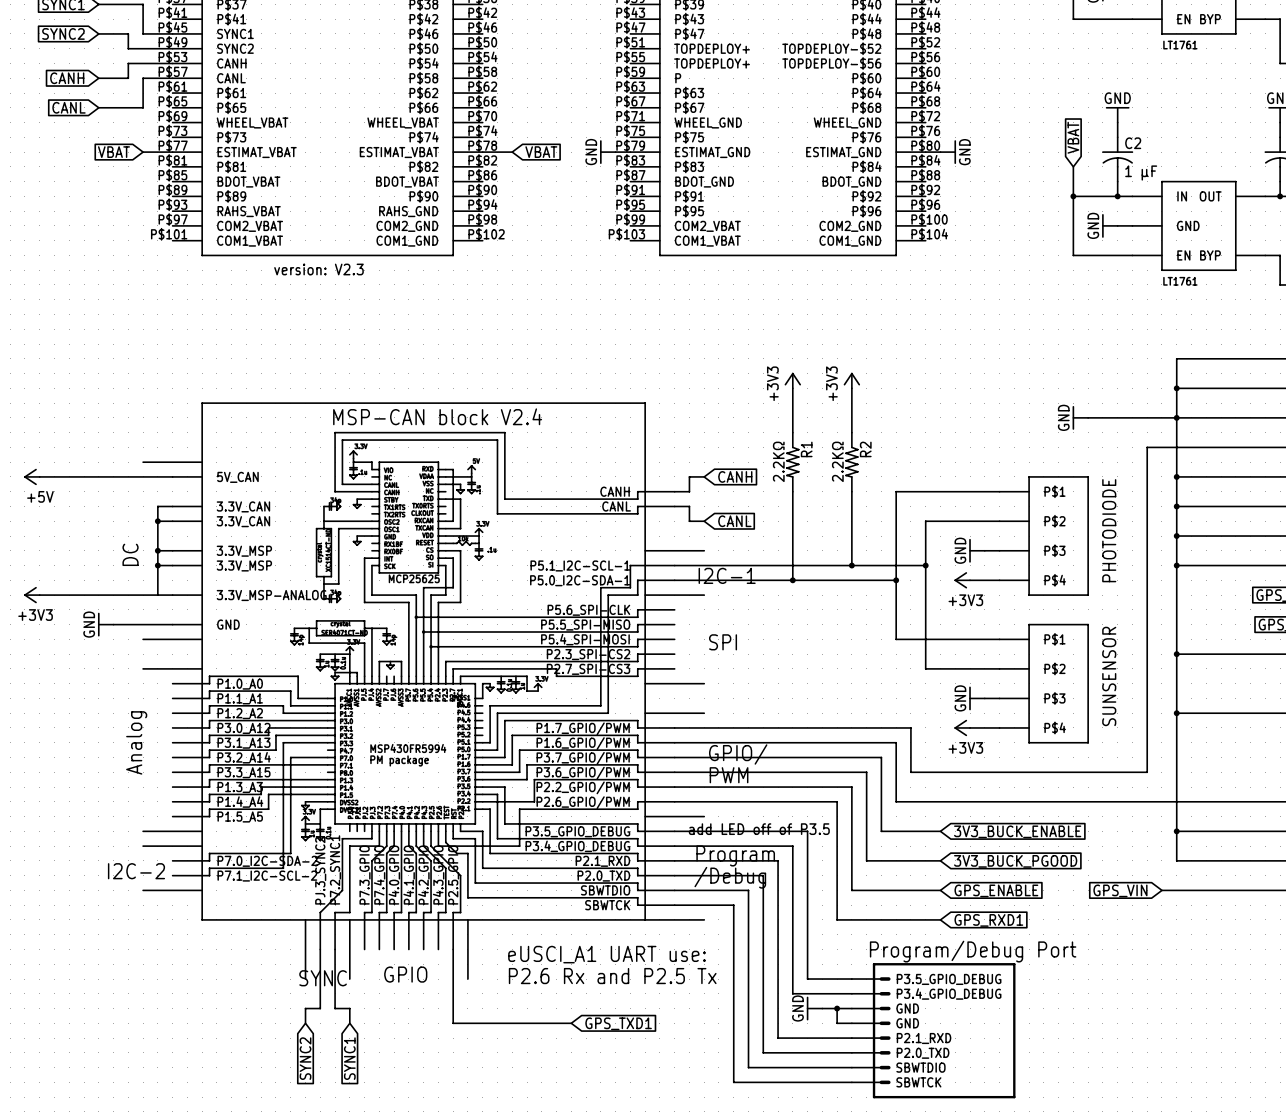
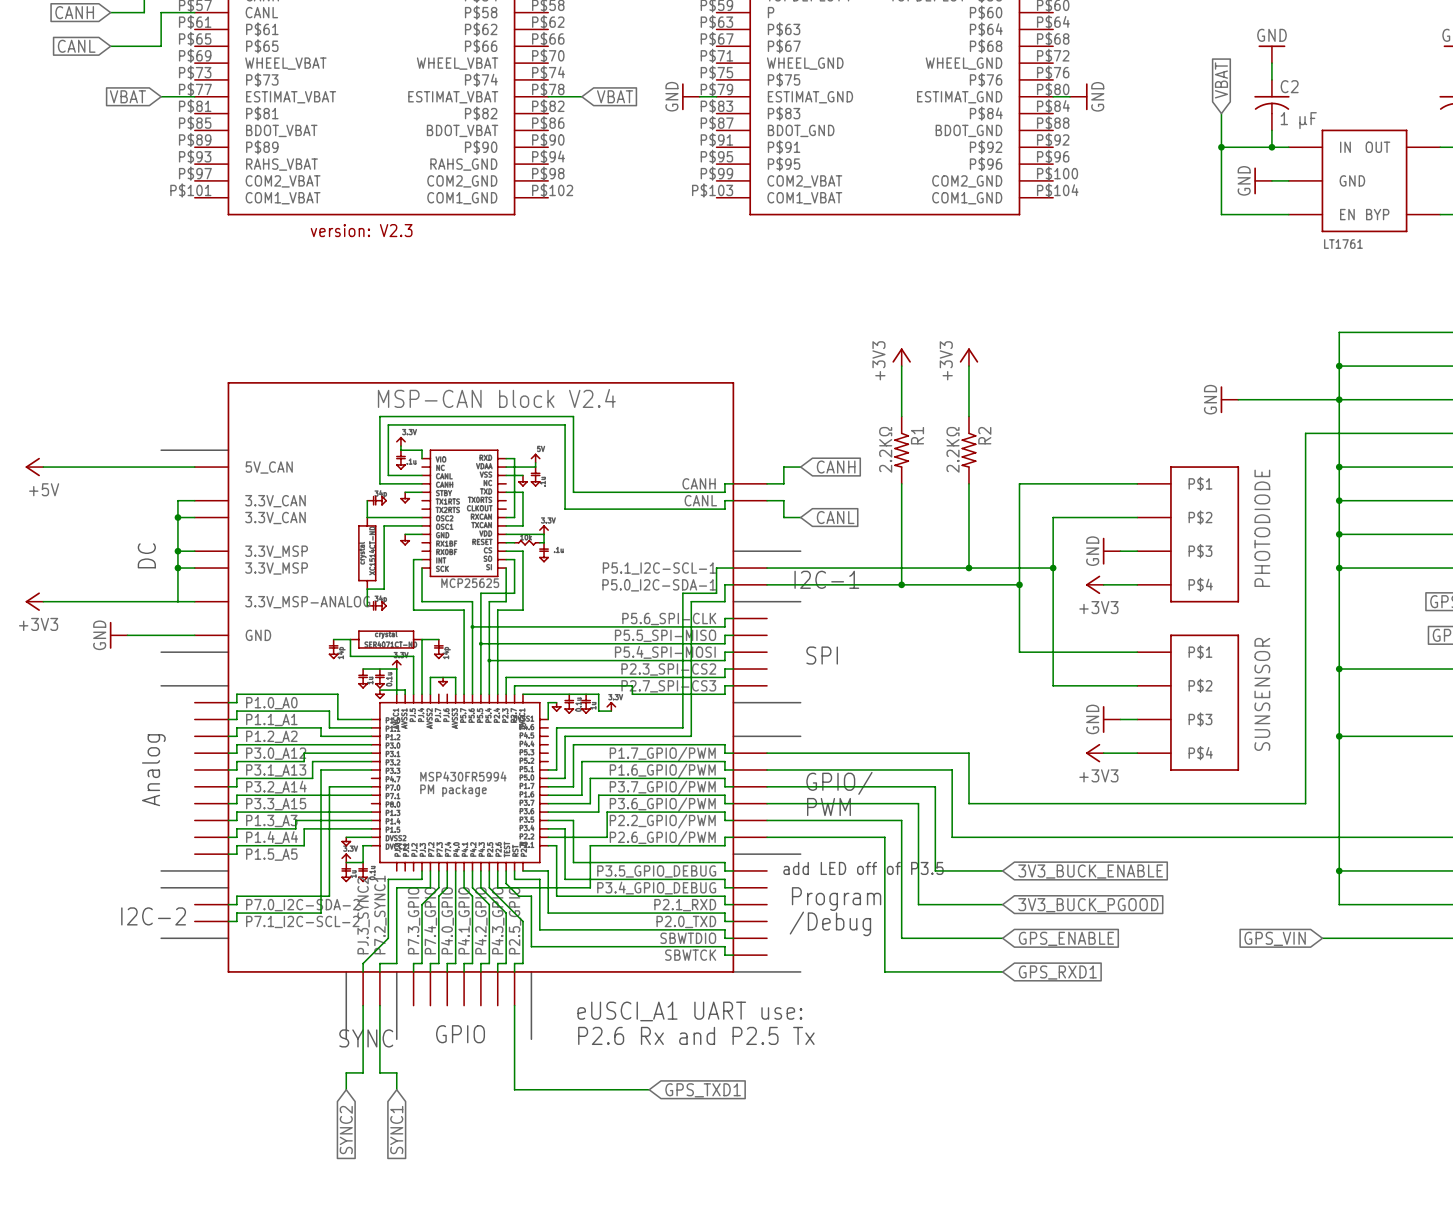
wire: (851, 727) (910, 727) (910, 772) -> (985, 803) (1036, 803)
wire: (837, 742) (896, 742) (896, 801) -> (952, 769) (952, 837) (1019, 837)
wire: (822, 757) (881, 757) (881, 831) (940, 831) -> (935, 786) (935, 870) (1002, 870)
wire: (807, 772) (851, 772) -> (968, 753) (968, 803)
wire: (866, 772) (866, 860) -> (918, 904) (985, 904)
wire: (792, 787) (851, 787) (851, 890) -> (901, 820) (901, 887)
wire: (778, 801) (837, 801) (837, 919) -> (884, 837) (884, 904)
wire: (674, 831) (807, 831) -> (918, 803) (918, 870)
global label position: 3V3_BUCK_ENABLE (1017, 831) -> 3V3_BUCK_ENABLE (1090, 871)
wire: (674, 846) (792, 846) -> none
wire: (674, 860) (778, 860) -> none
wire: (807, 860) (807, 979) (851, 979) -> none
wire: (881, 860) (940, 860) -> none
global label position: 3V3_BUCK_PGOOD (1015, 861) -> 3V3_BUCK_PGOOD (1088, 905)
wire: (674, 875) (763, 875) (763, 1052) (851, 1052) -> none
wire: (674, 890) (748, 890) (748, 1067) (851, 1067) -> none
wire: (792, 890) (792, 993) (851, 993) -> (901, 938) (968, 938)
wire: (881, 890) (940, 890) -> none
global label position: GPS_ENABLE (996, 890) -> GPS_ENABLE (1066, 938)
wire: (674, 905) (733, 905) (733, 1082) (851, 1082) -> none
wire: (778, 919) (778, 1038) (851, 1038) -> (884, 971) (952, 971)
wire: (881, 919) (940, 919) -> none
global label position: GPS_RXD1 (988, 920) -> GPS_RXD1 (1057, 972)
power symbol: GND (814, 1008) -> none
wire: (822, 1008) (851, 1008) -> none
wire: (837, 1008) (837, 1023) (851, 1023) -> none
junction: (837, 1008) -> none
part: (933, 1030) -> none

